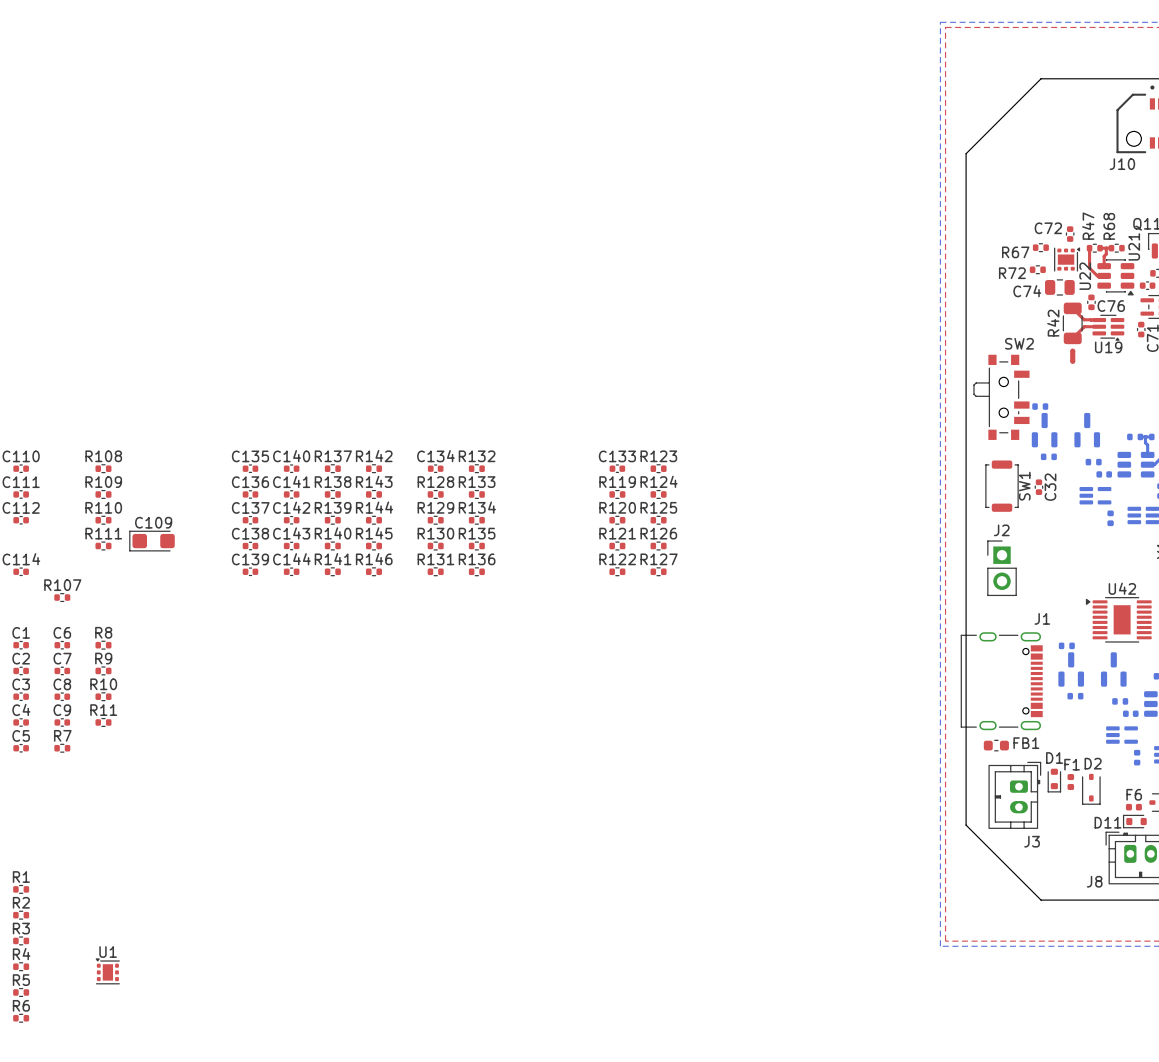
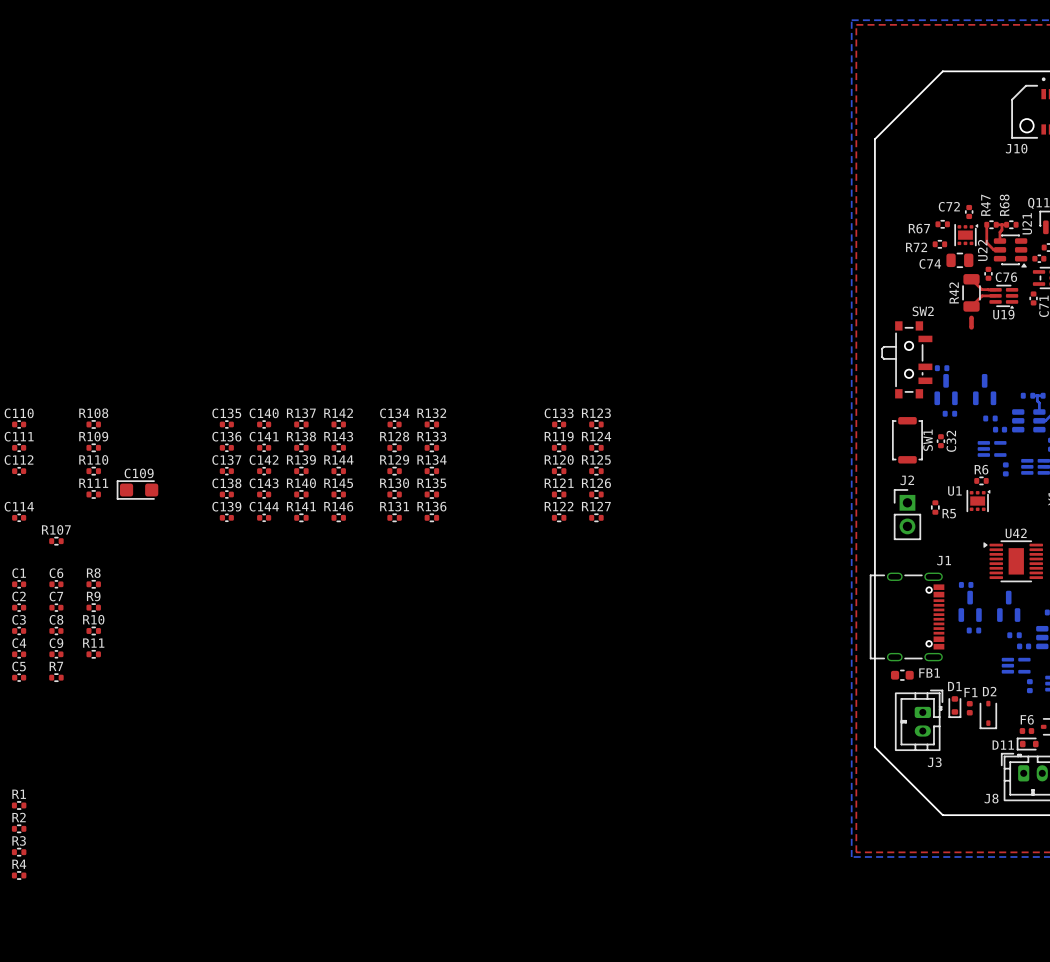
U1 name position: U1 (108, 952) -> U1 (954, 491)
U1 rotation: 0° (107, 971) -> 90° clockwise (978, 500)
U1 position: (107, 971) -> (978, 500)
R5 rotation: 0° (21, 992) -> 90° clockwise (935, 507)
R5 position: (21, 992) -> (935, 507)
R6 position: (21, 1018) -> (981, 480)

